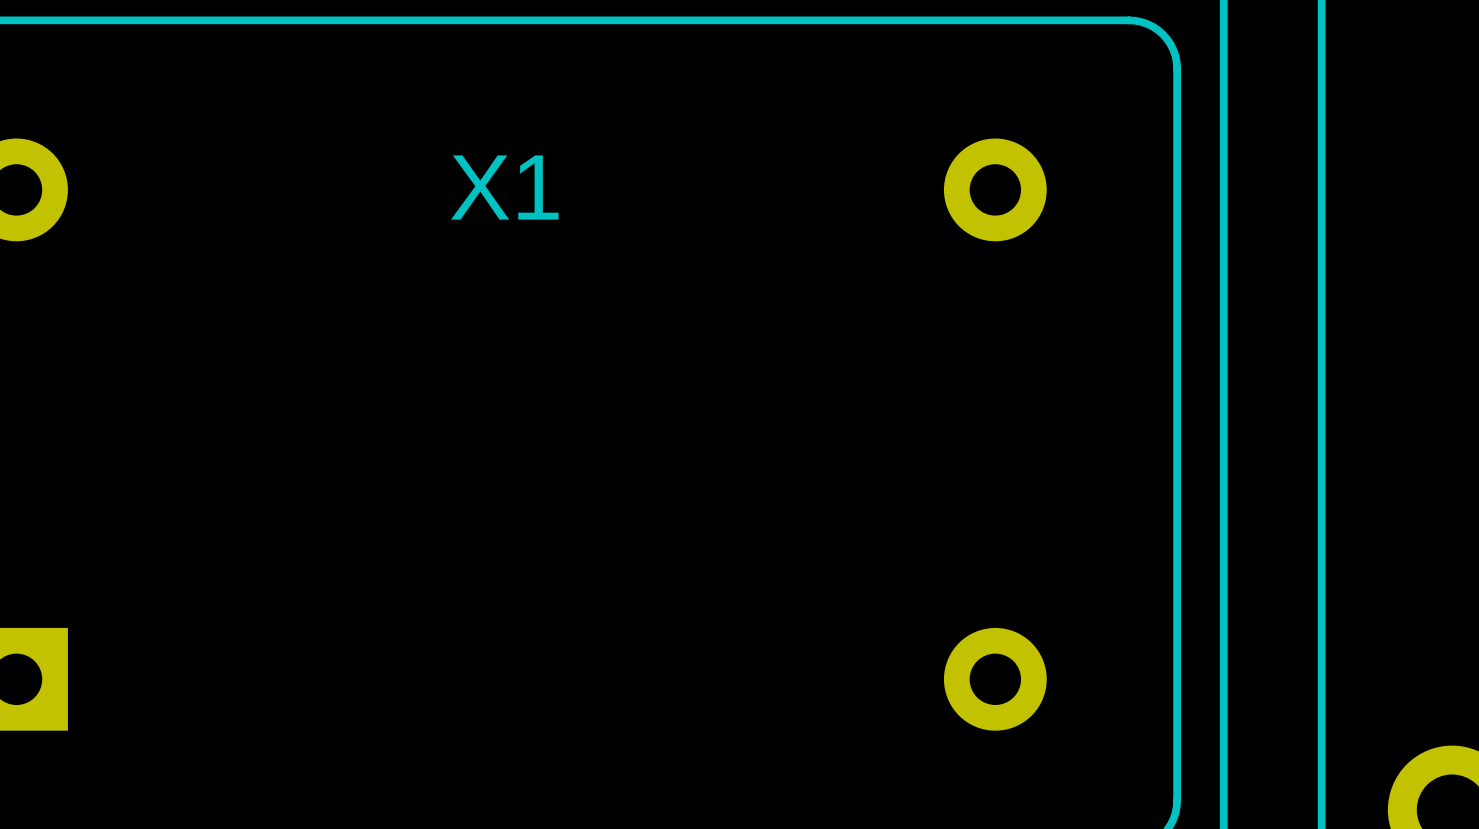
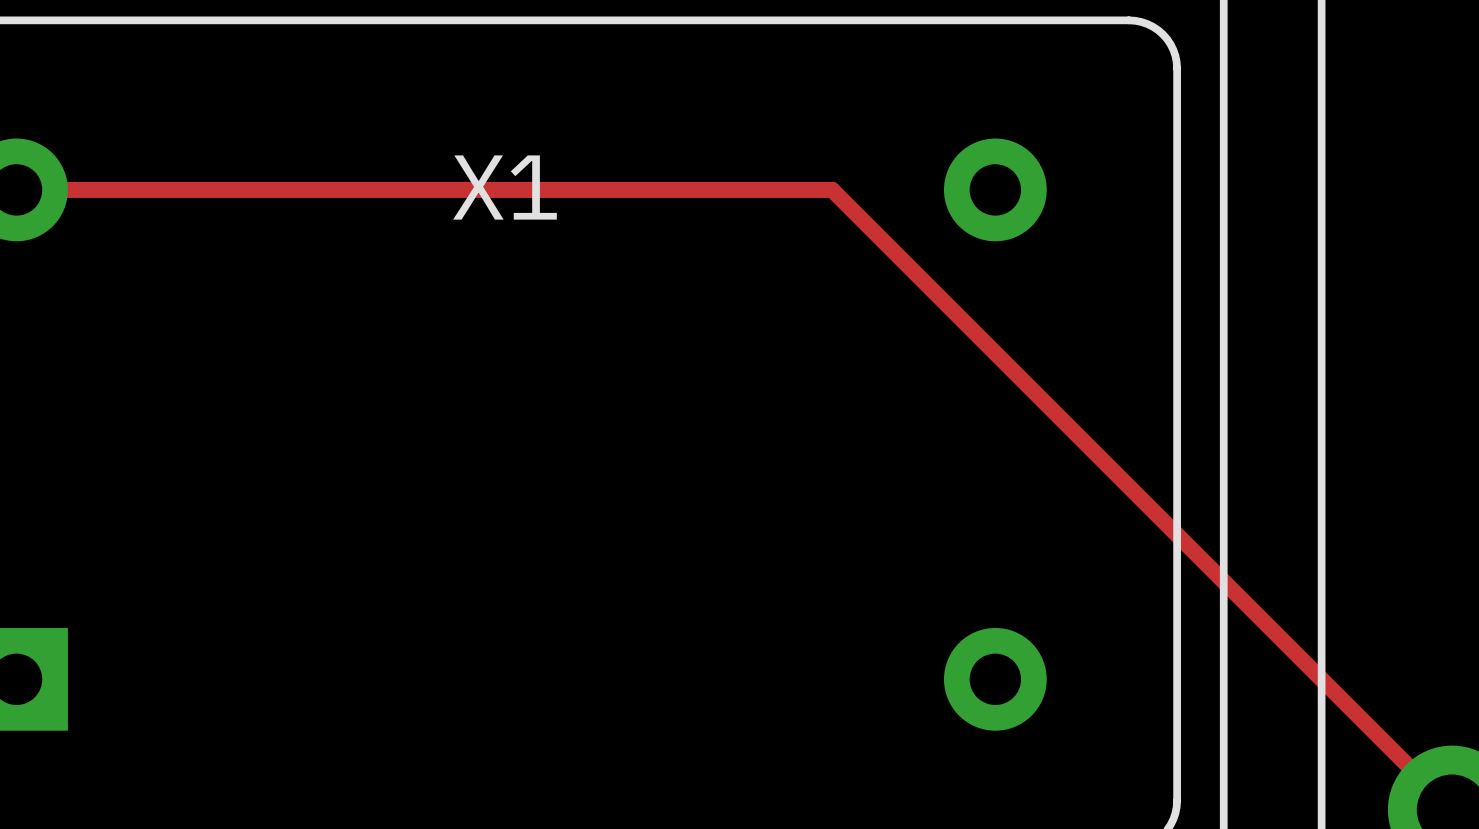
track: none -> (16, 189) (832, 189) (1452, 809)

